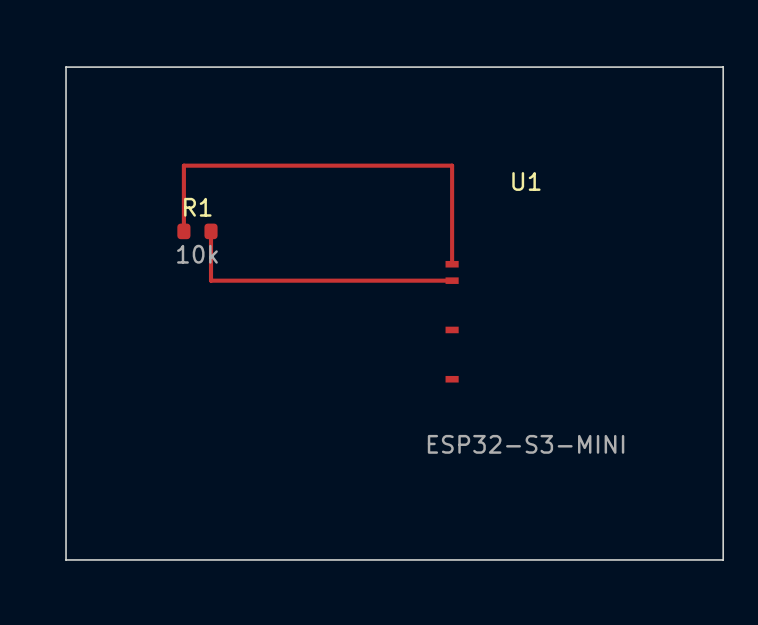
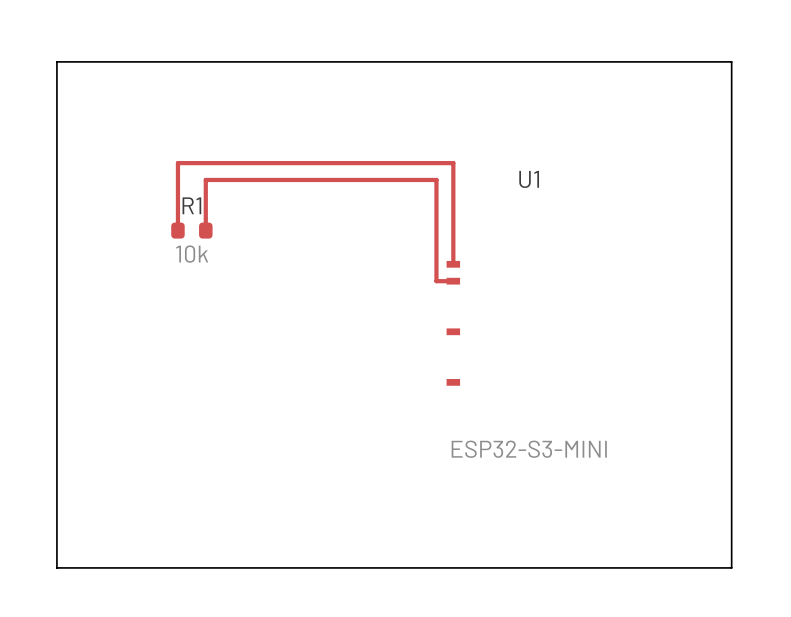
top track: (211, 231) (211, 280) (435, 280) -> (205, 230) (205, 179) (436, 179) (436, 281)

